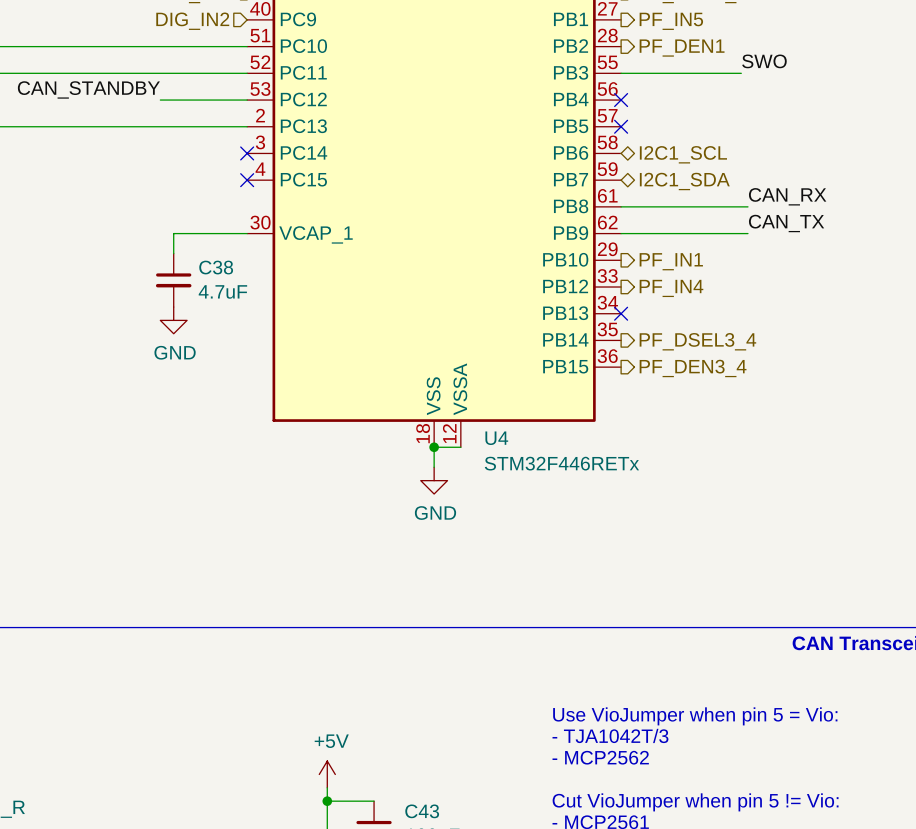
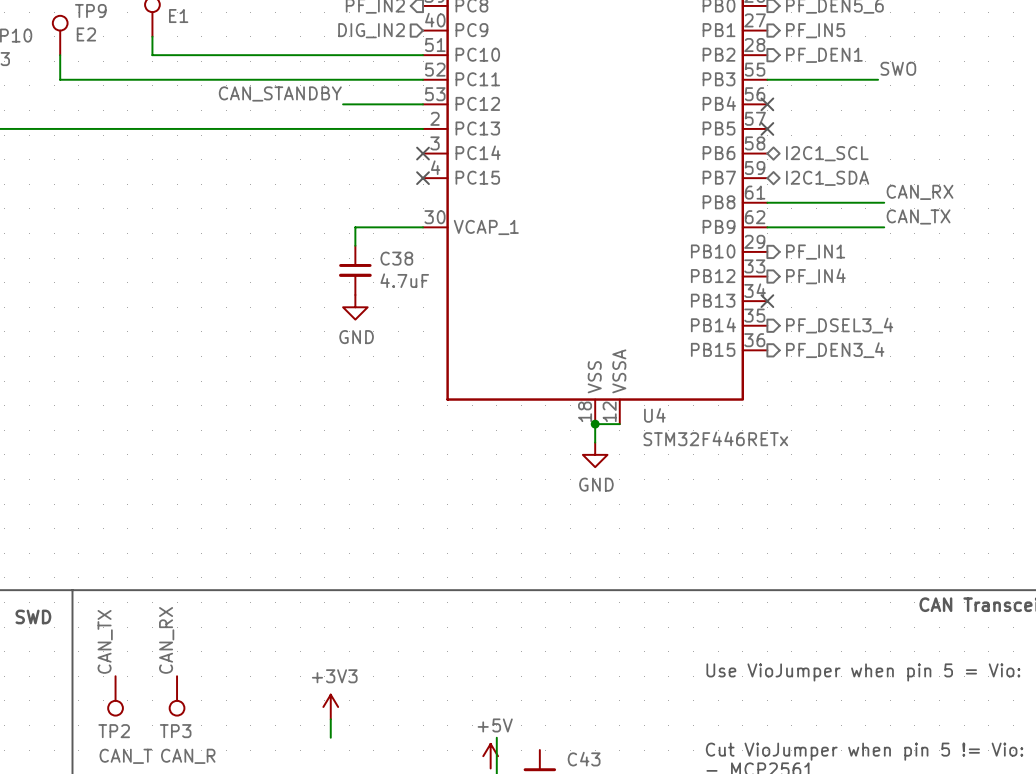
text: - TJA1042T/3 (610, 735) -> none
power symbol: none -> +3V3 (330, 706)
text: - MCP2562 (600, 757) -> none
wire: none -> (330, 719) (330, 737)
power symbol position: +5V (327, 774) -> +5V (490, 756)
wire: (327, 801) (374, 801) -> none
junction: (327, 801) -> none

